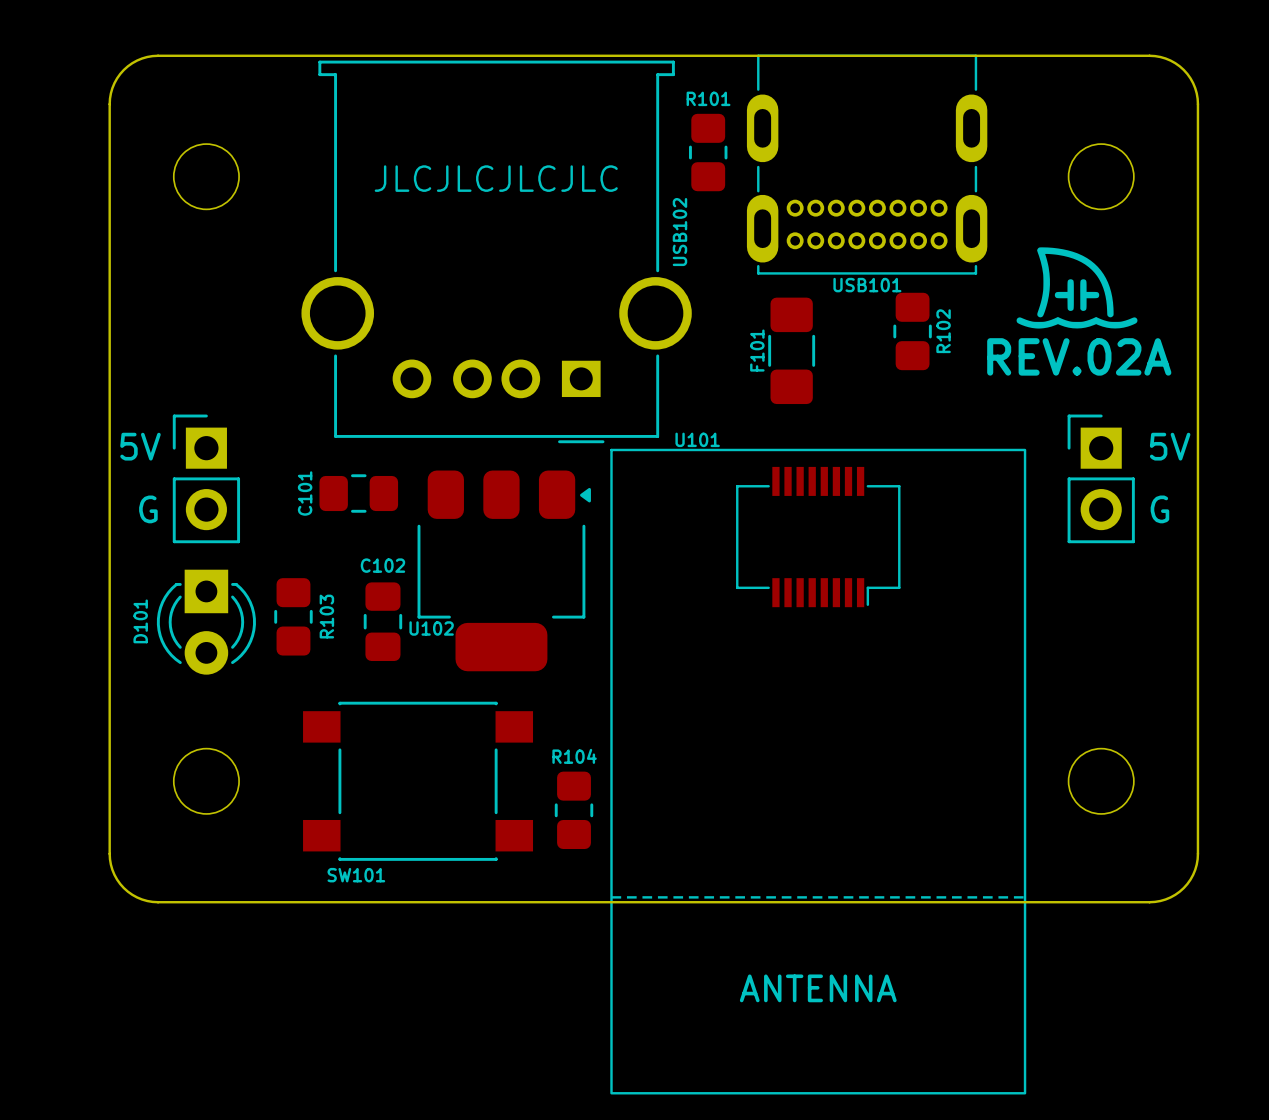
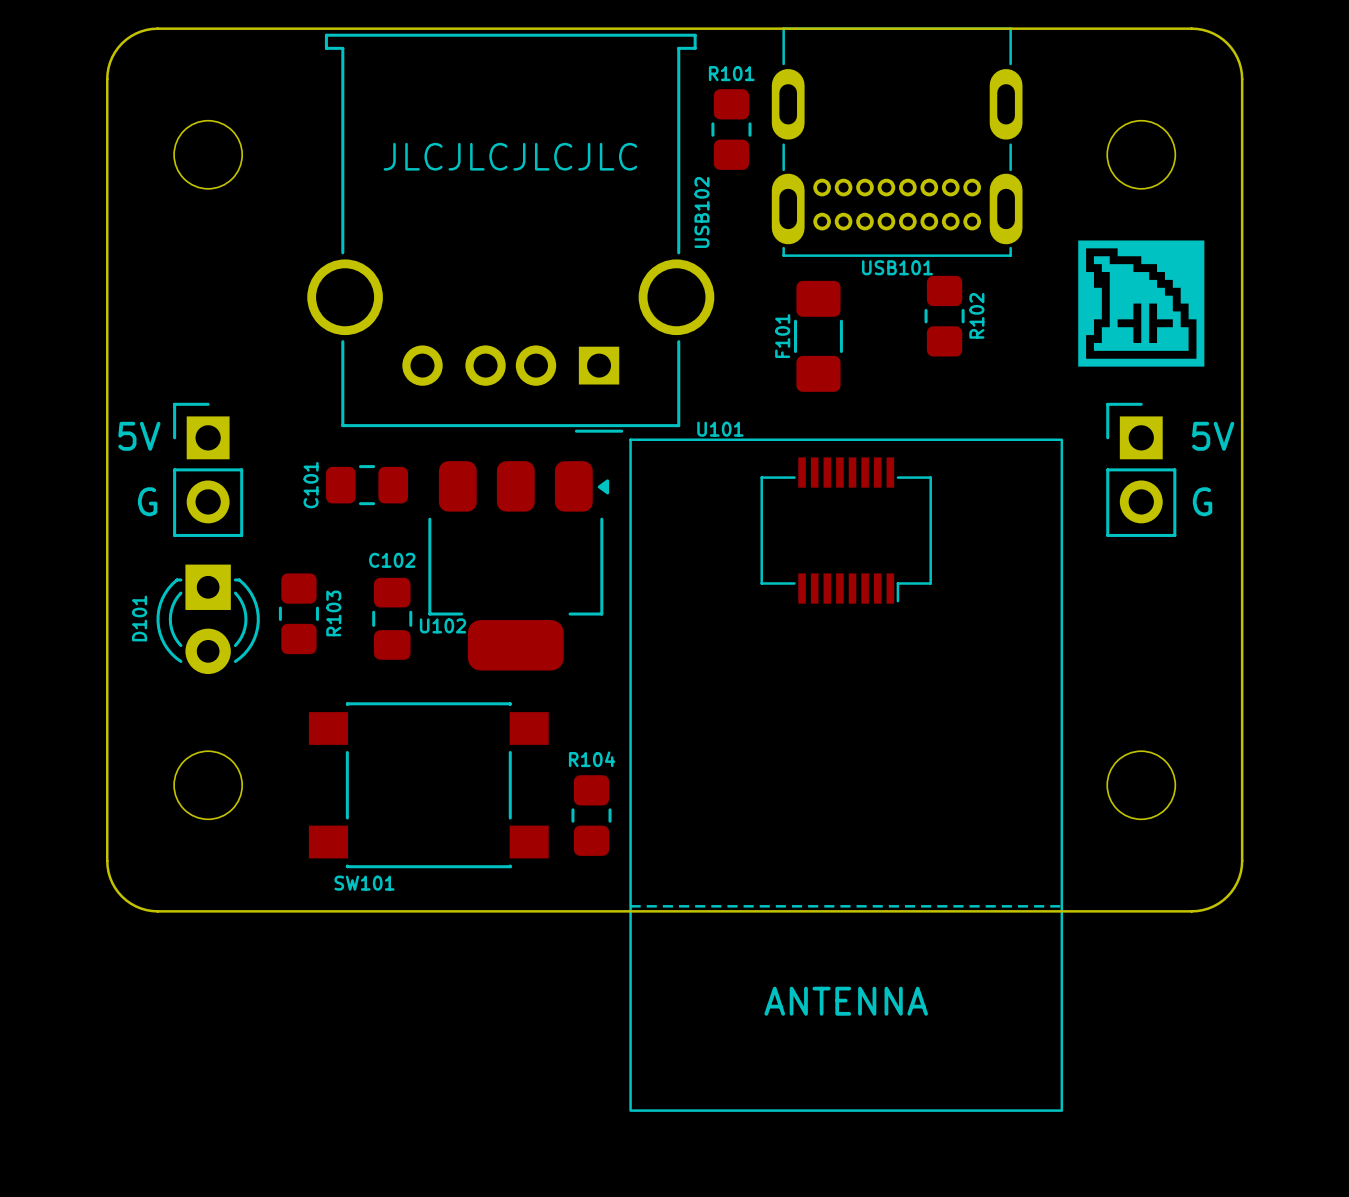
drawing: [1016, 247, 1138, 329] -> none
drawing: none -> [1078, 240, 1205, 367]
text: REV.02A (1079, 356) -> none

